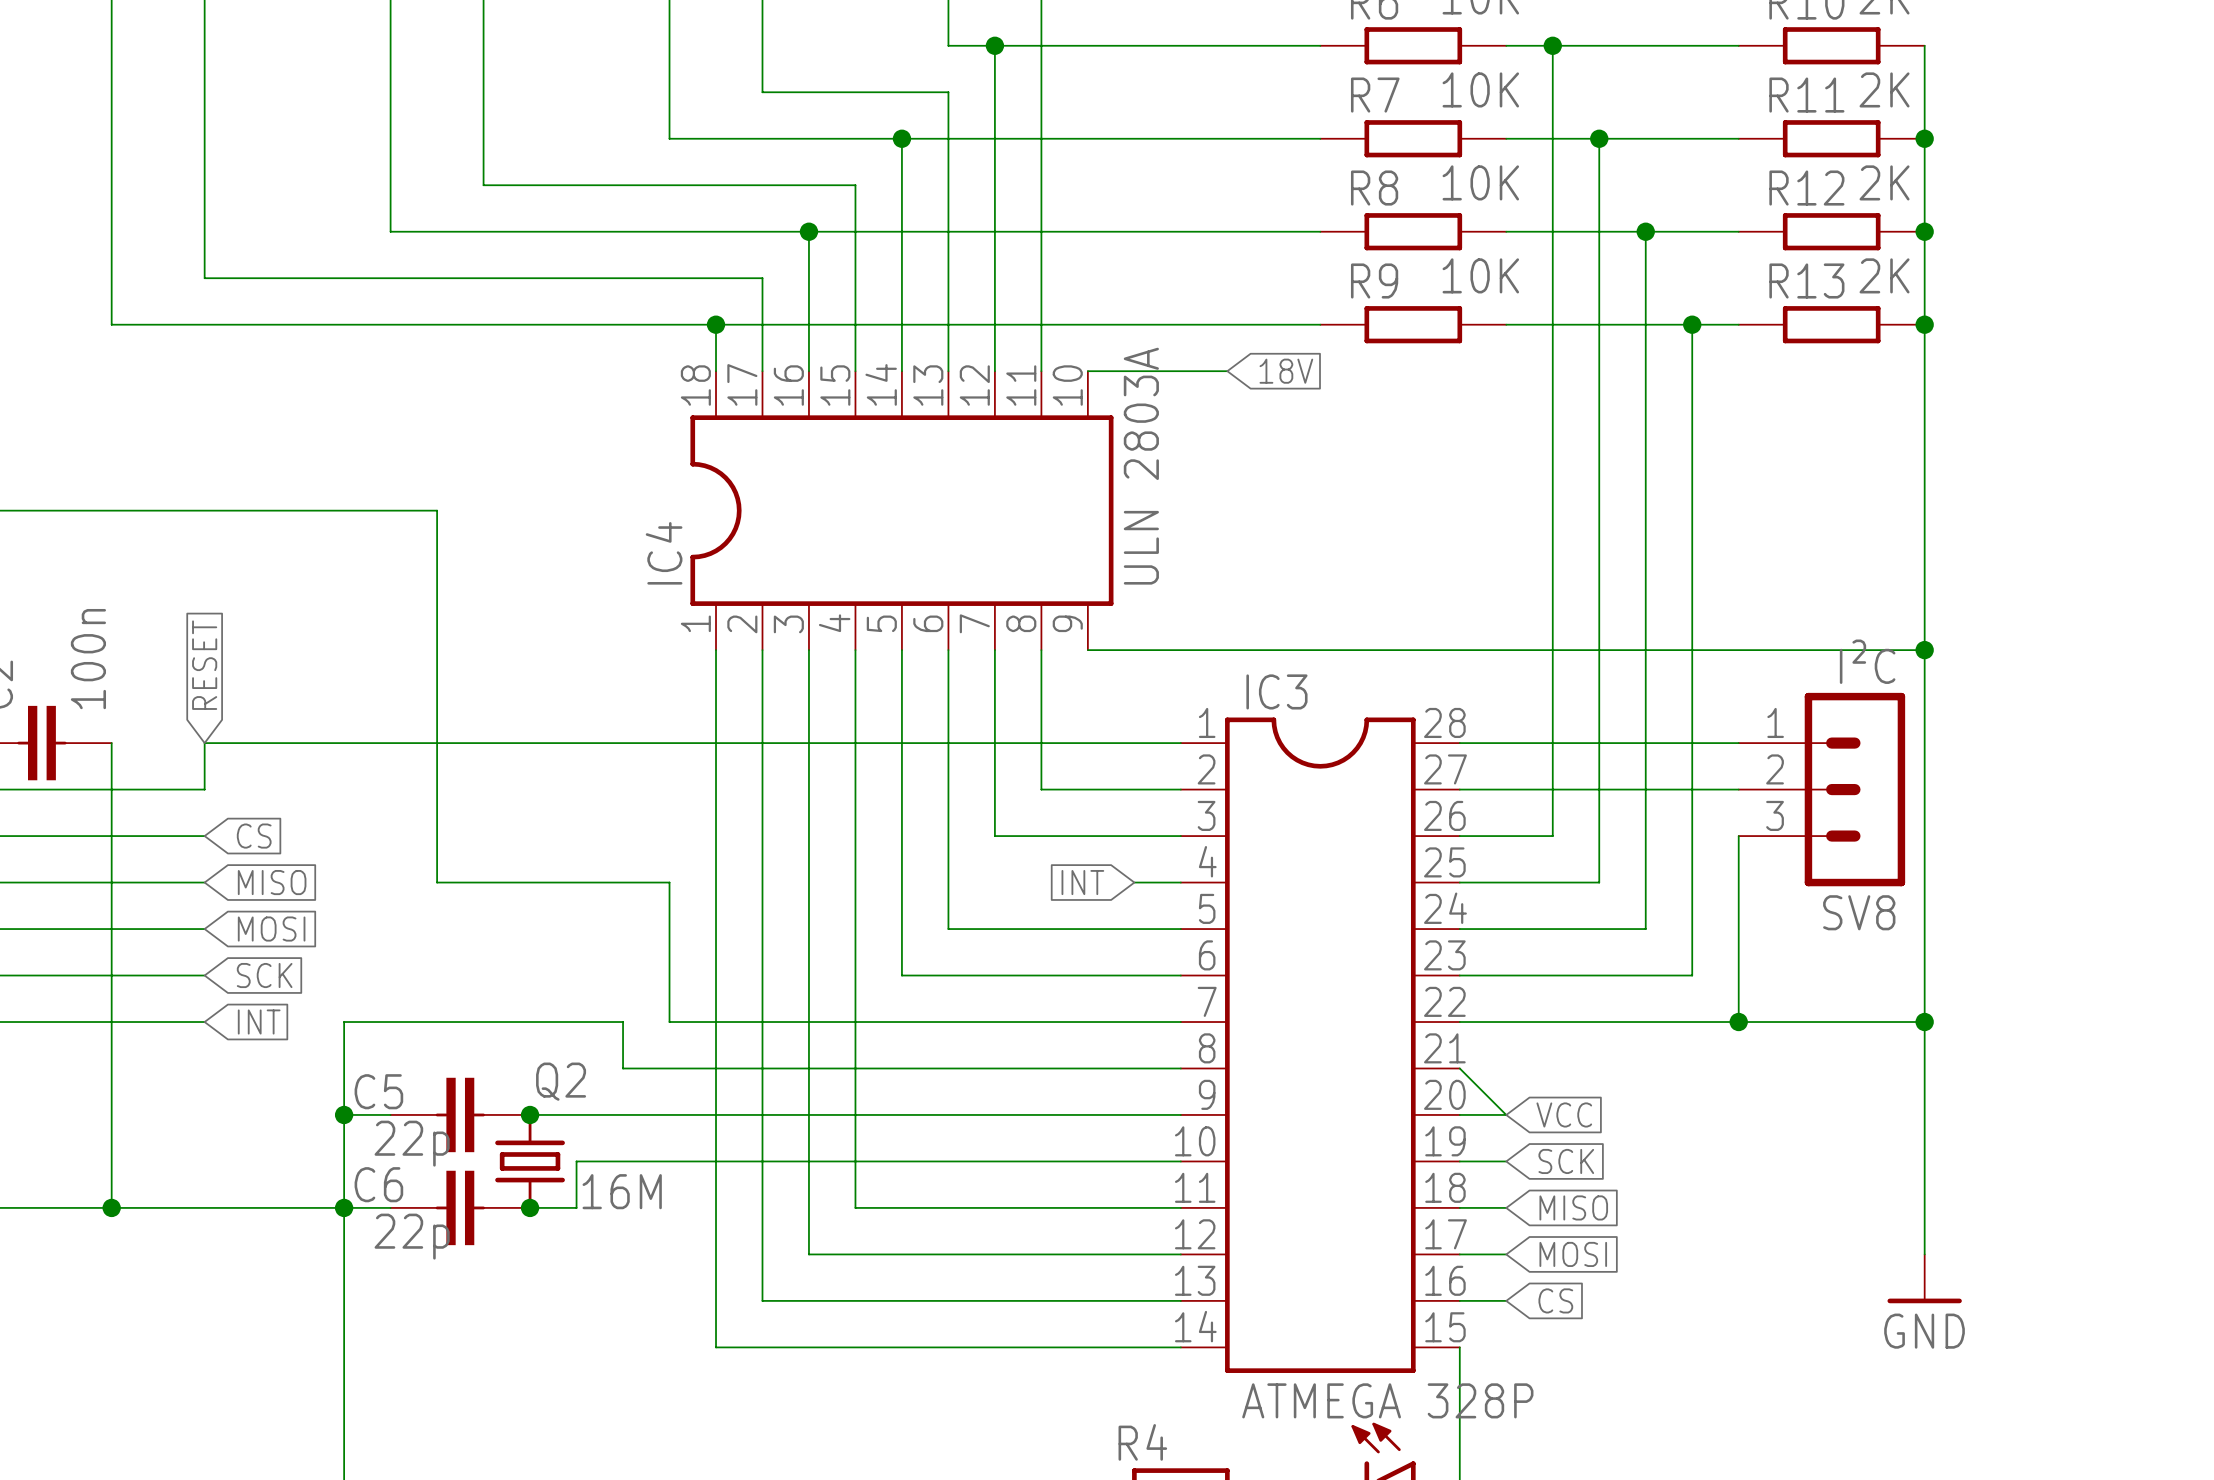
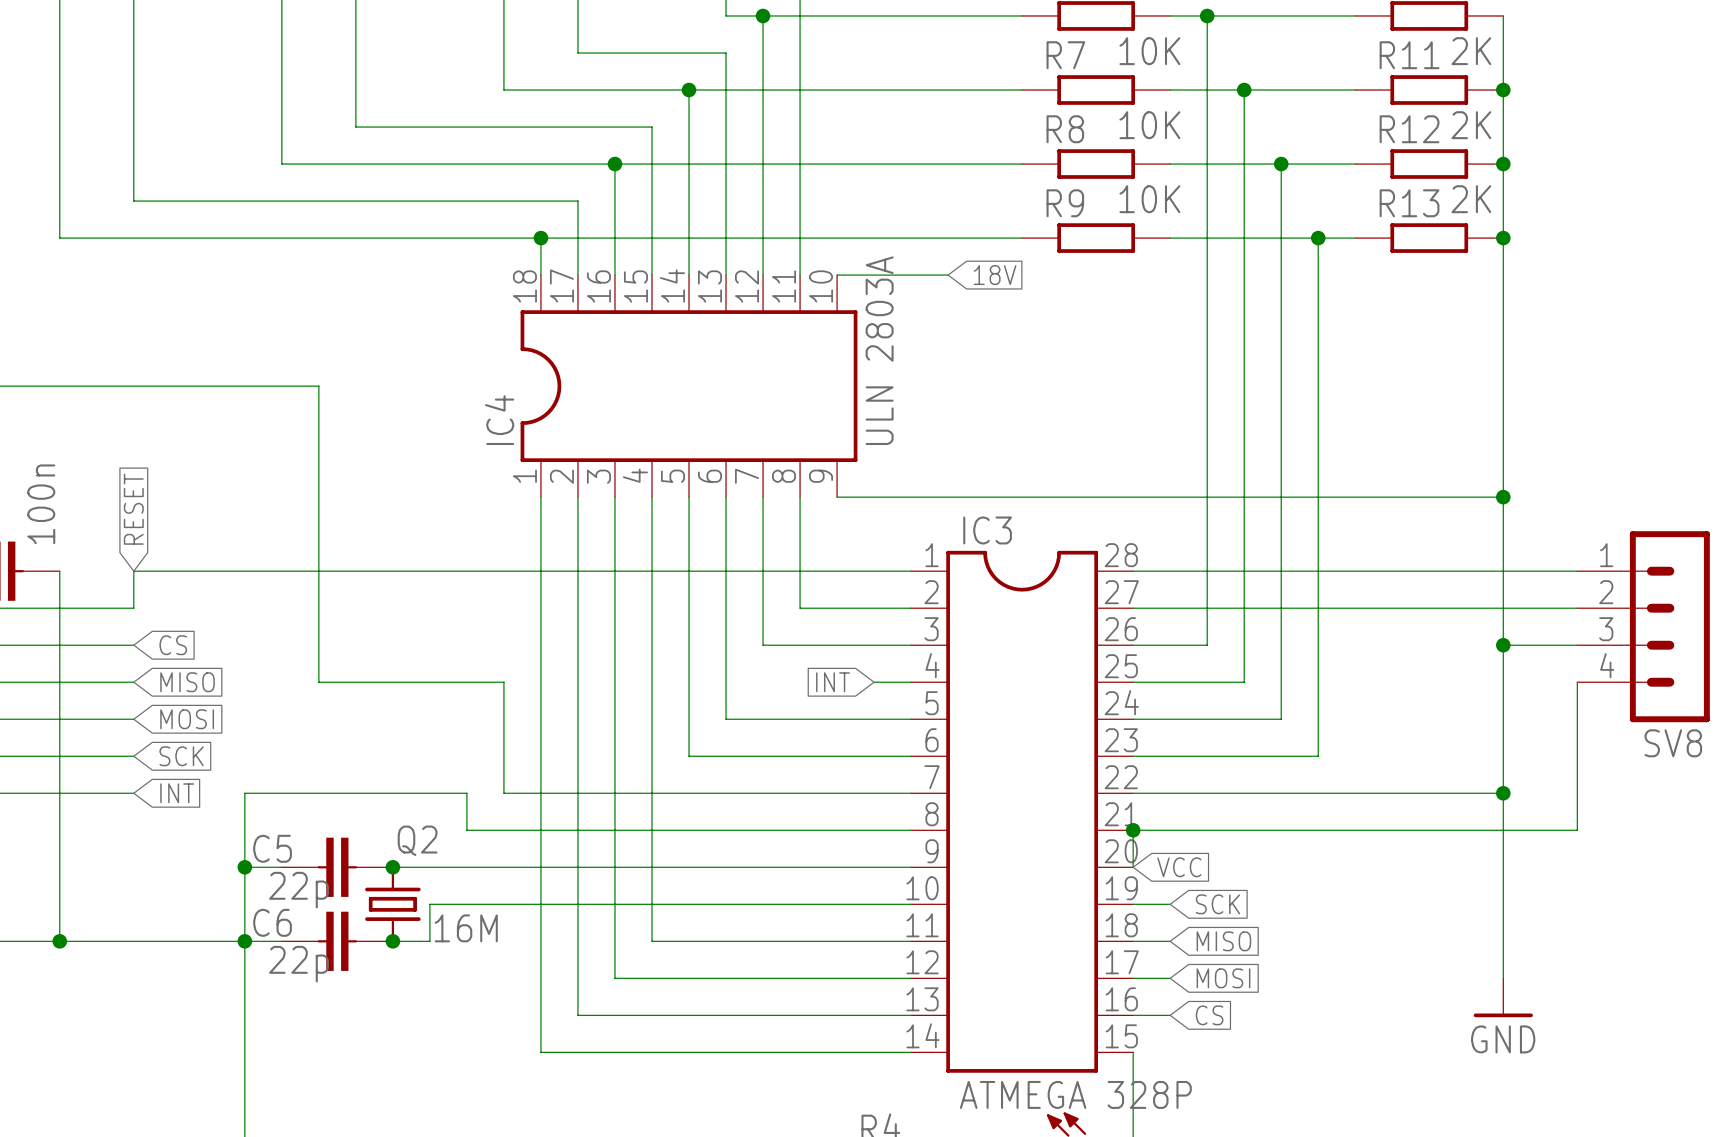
SV8 value: I²C (1867, 661) -> none
SV8 symbol: [1738, 692, 1906, 887] -> [1577, 531, 1710, 723]
wire: none -> (1355, 571) (1577, 571)
wire: none -> (1355, 608) (1577, 608)
wire: (1738, 836) (1738, 1022) -> none
wire: none -> (1503, 645) (1577, 645)
junction: none -> (1503, 645)
junction: (1738, 1022) -> none
wire: (1459, 1068) (1506, 1114) (1459, 1114) -> (1577, 682) (1577, 830) (1133, 830) (1133, 867)
junction: none -> (1133, 830)
global label position: VCC (1564, 1114) -> VCC (1179, 867)

